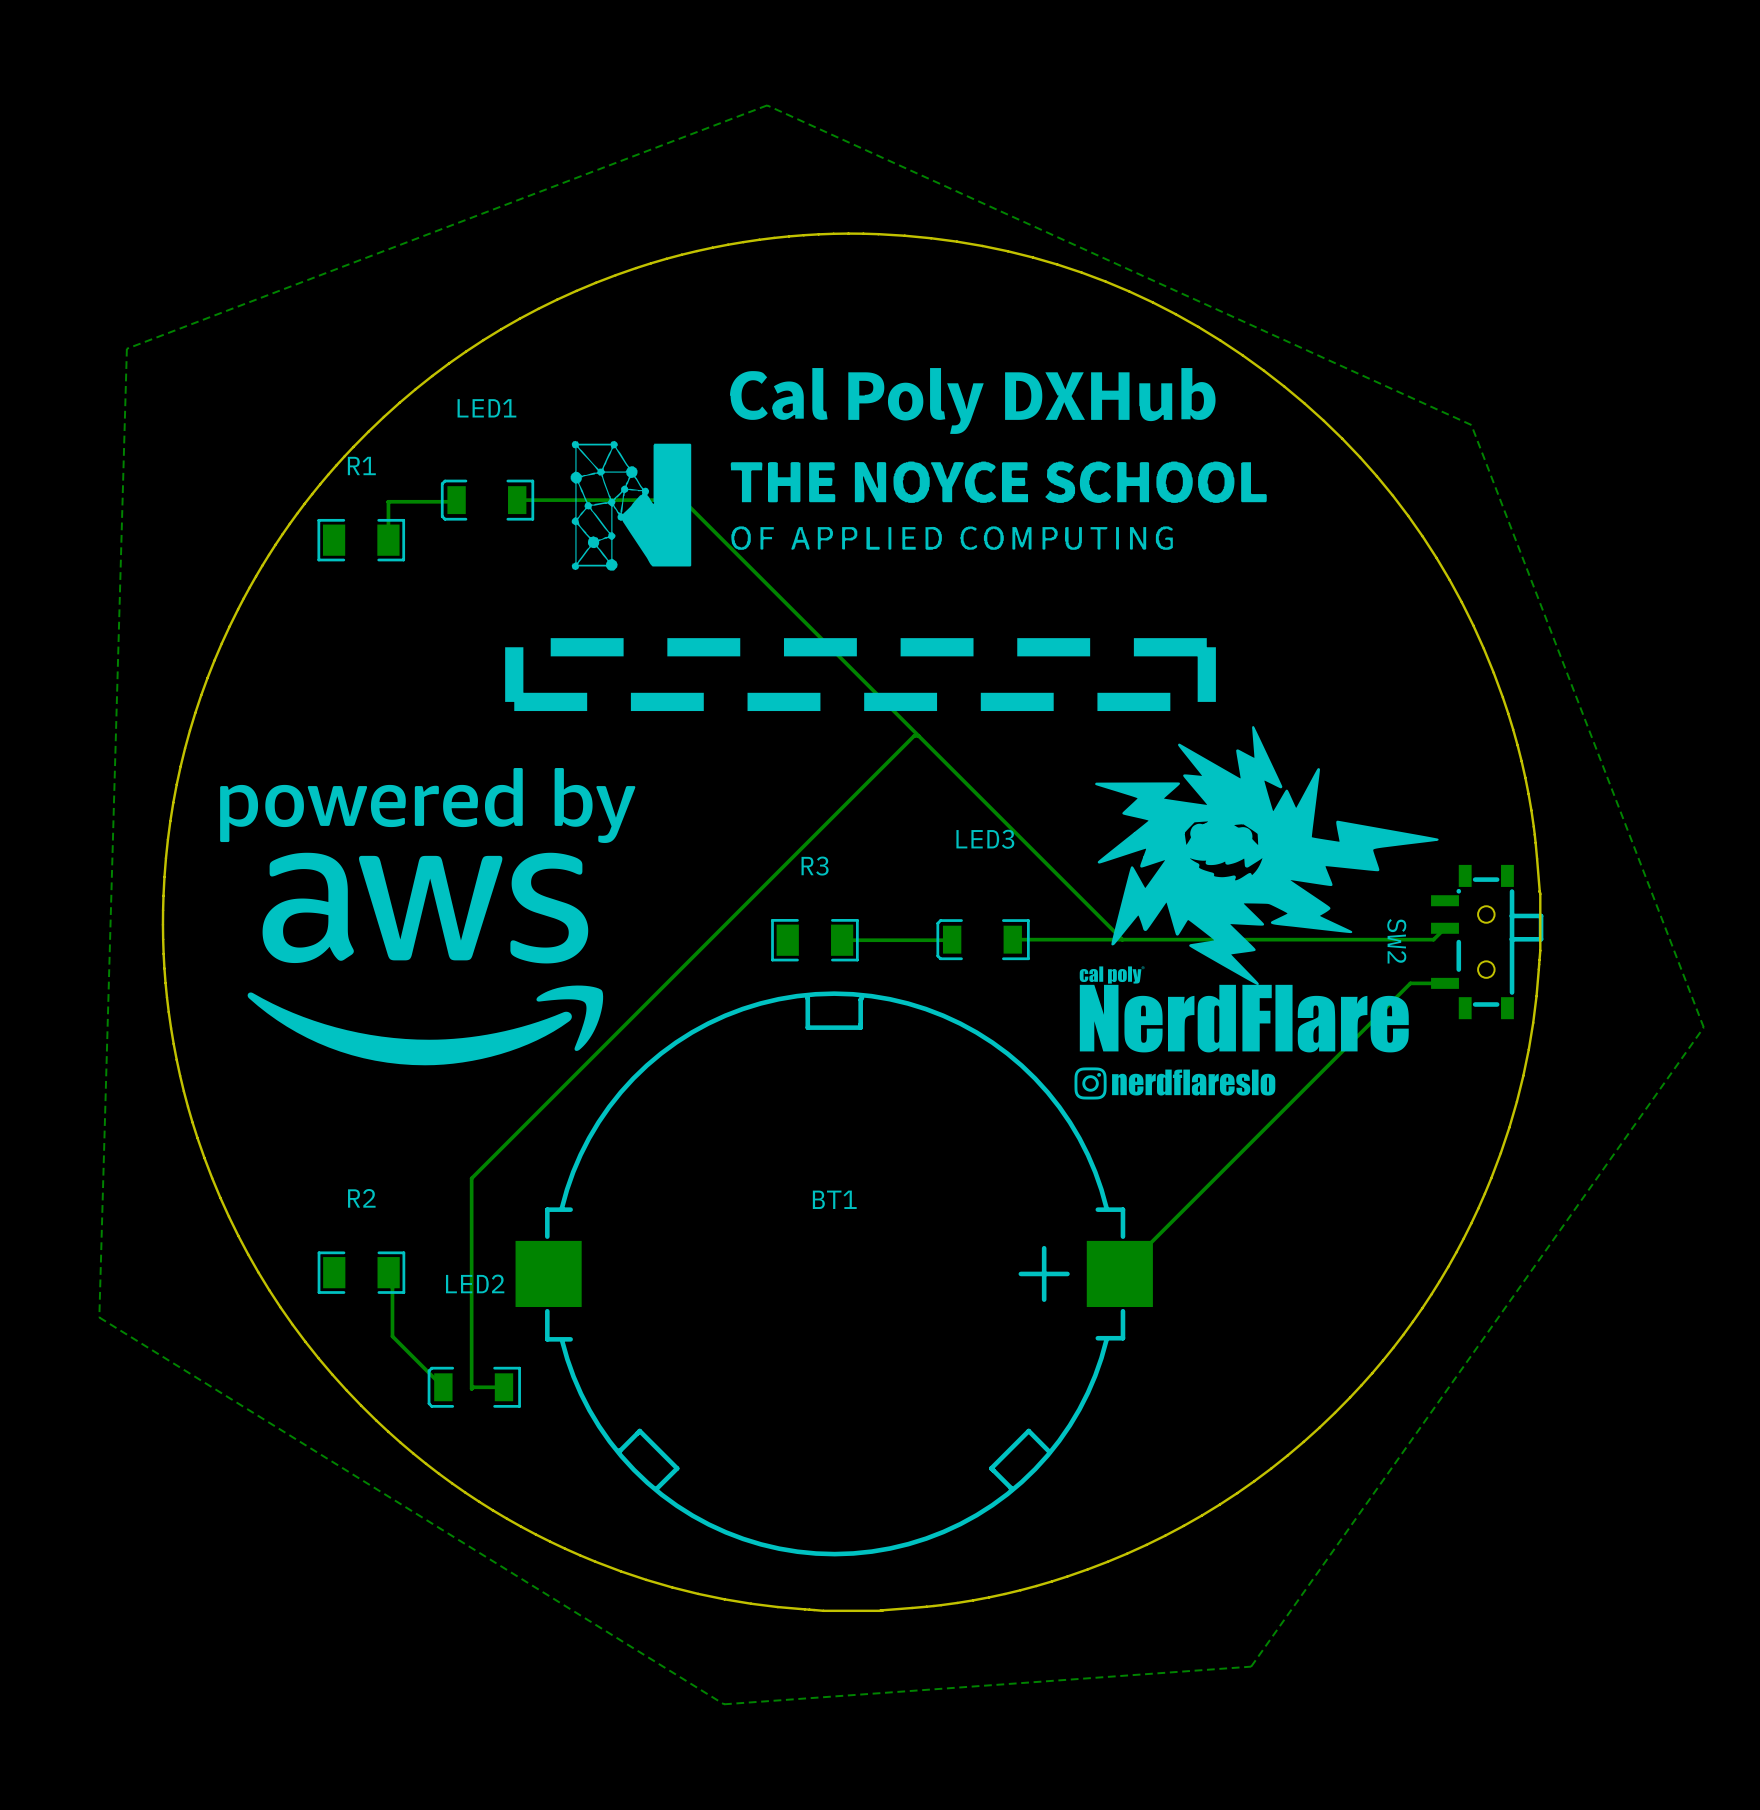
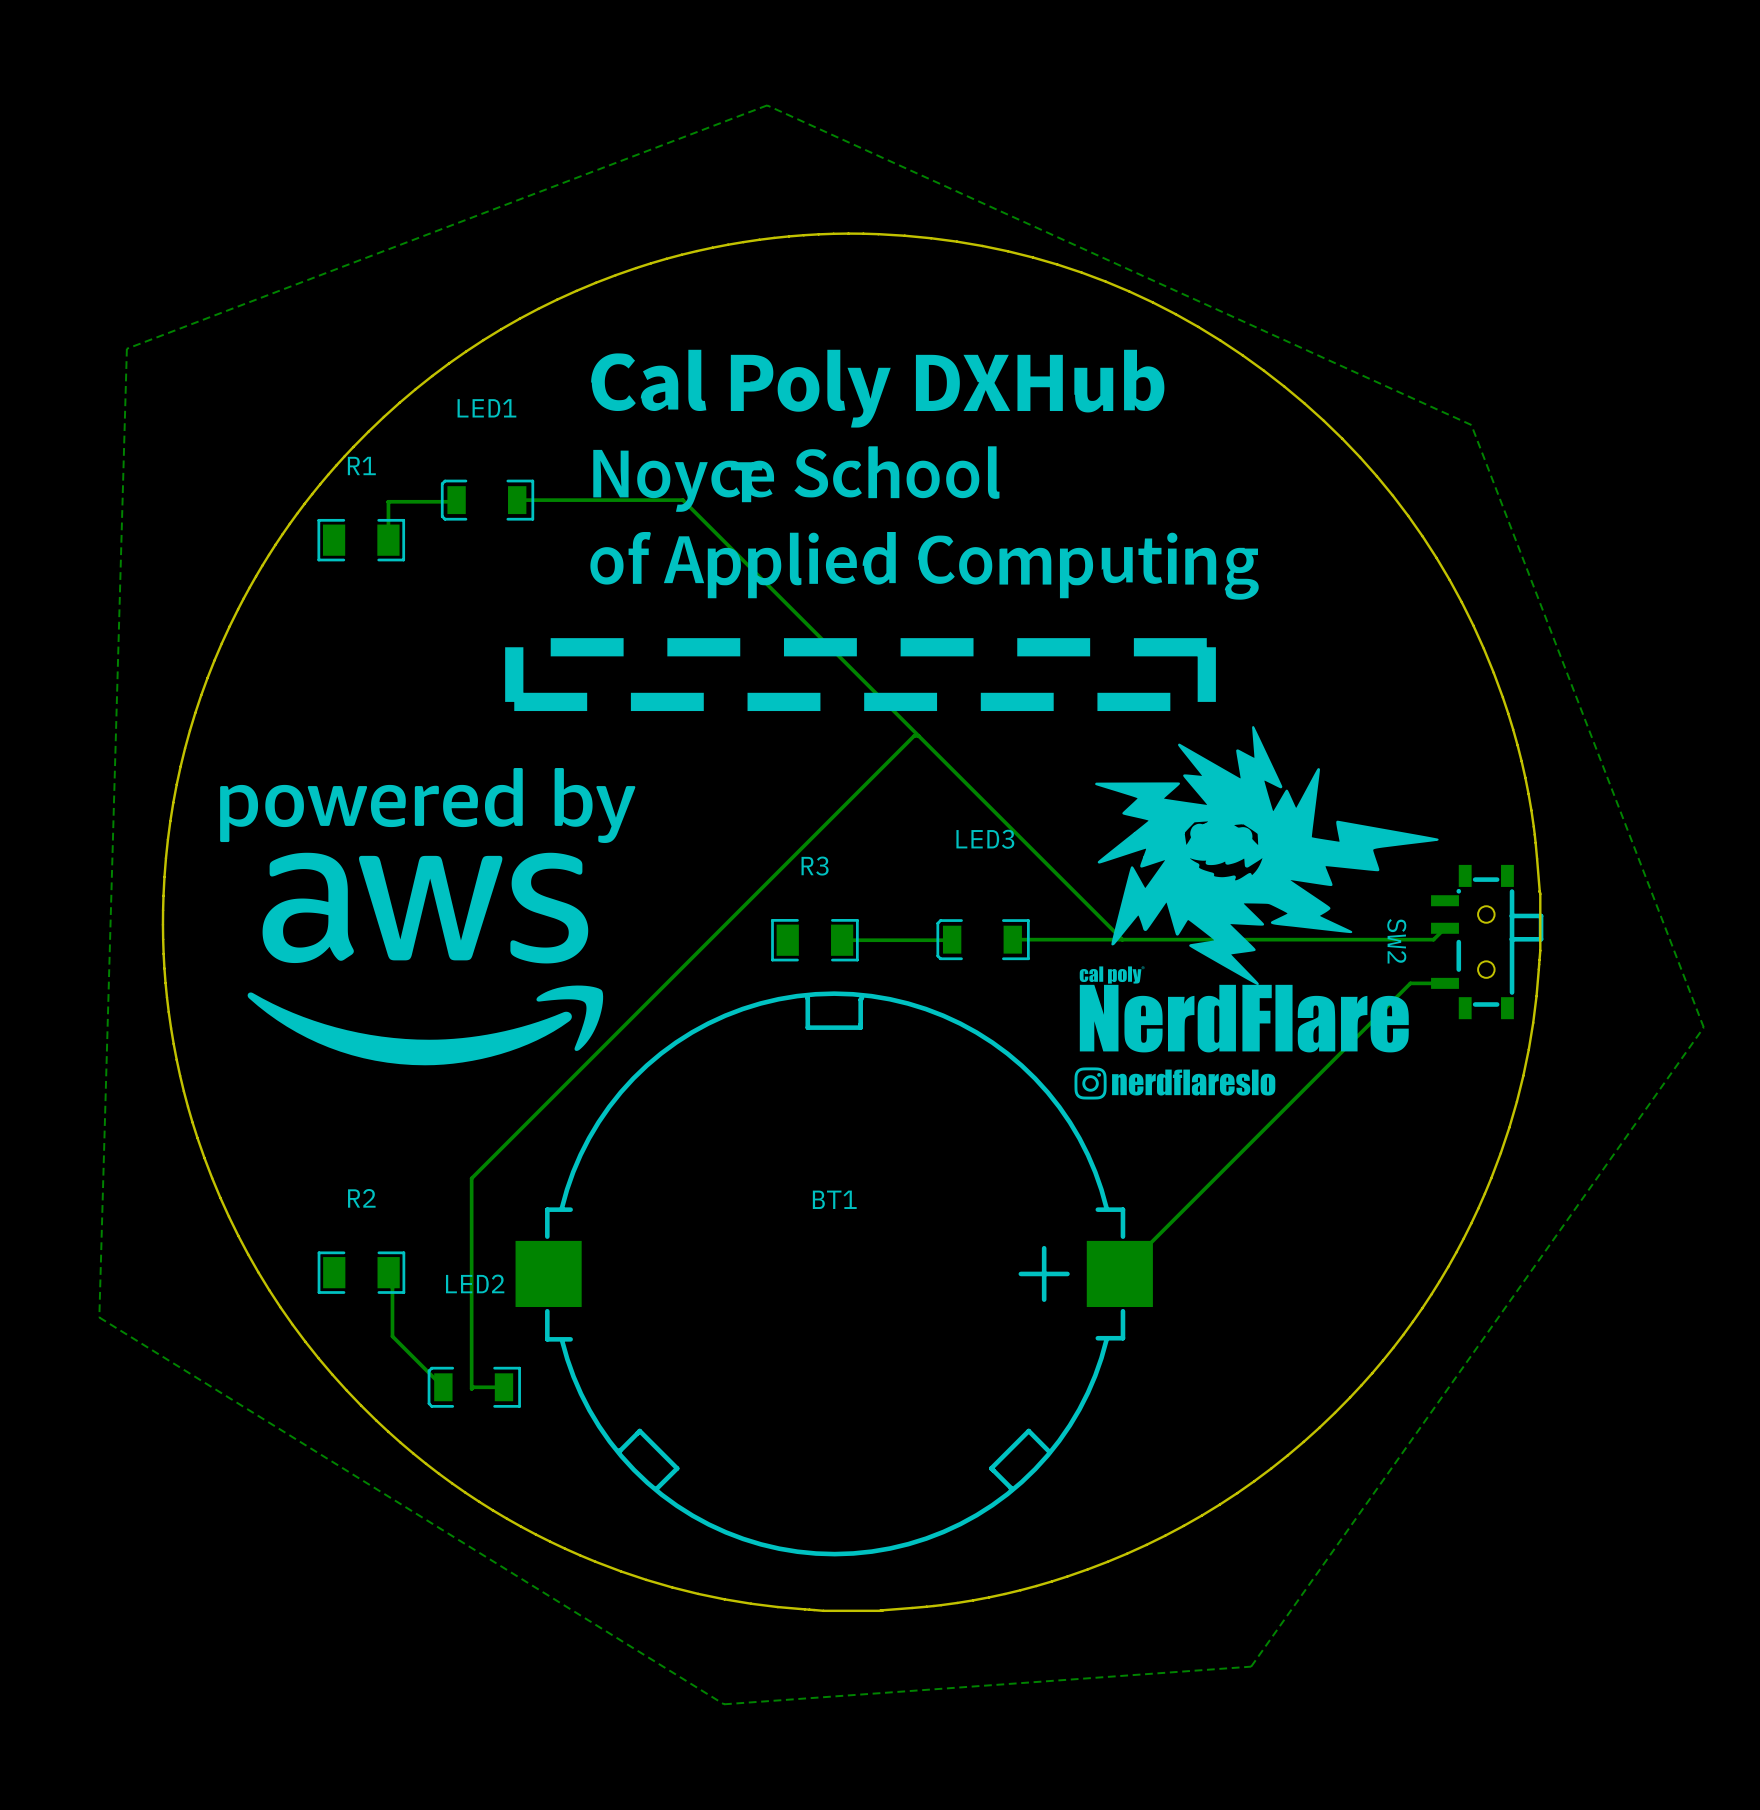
drawing: none -> [591, 349, 707, 412]
drawing: none -> [777, 349, 846, 412]
drawing: none -> [963, 349, 1165, 413]
drawing: [772, 368, 828, 420] -> none
drawing shape: [930, 368, 946, 420] -> [915, 354, 960, 412]
drawing: [947, 368, 1216, 434] -> none
drawing shape: [729, 371, 768, 420] -> [730, 354, 774, 412]
drawing shape: [848, 372, 885, 420] -> [847, 367, 891, 428]
drawing: [887, 382, 924, 421] -> none
drawing: [570, 440, 692, 571] -> none
drawing: none -> [593, 446, 900, 512]
drawing: none -> [946, 446, 1000, 499]
drawing shape: [893, 461, 930, 503] -> [906, 460, 940, 499]
drawing: [930, 461, 1267, 503] -> none
drawing: [767, 462, 887, 503] -> none
drawing: [731, 526, 1147, 550] -> none
drawing shape: [1155, 526, 1173, 550] -> [1167, 532, 1178, 543]
drawing: none -> [590, 531, 896, 599]
drawing: none -> [918, 535, 1259, 600]

